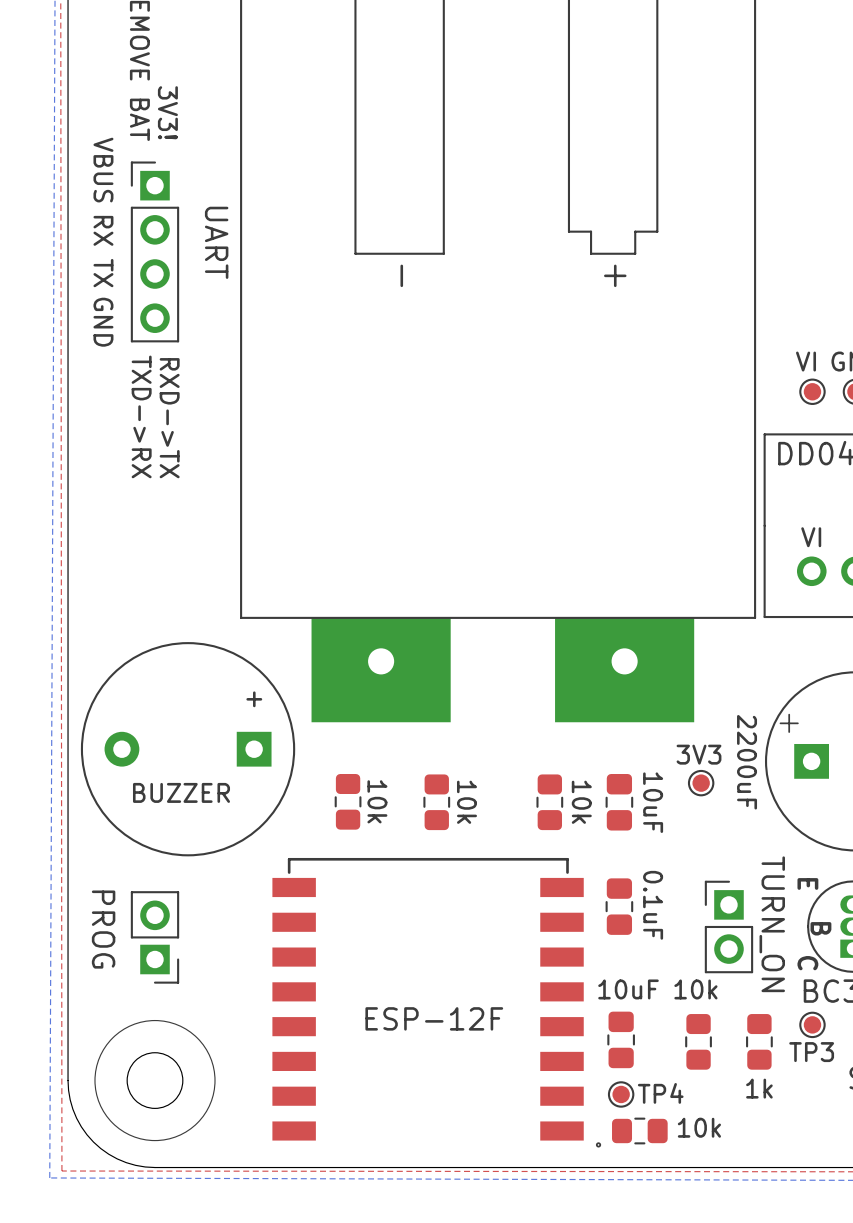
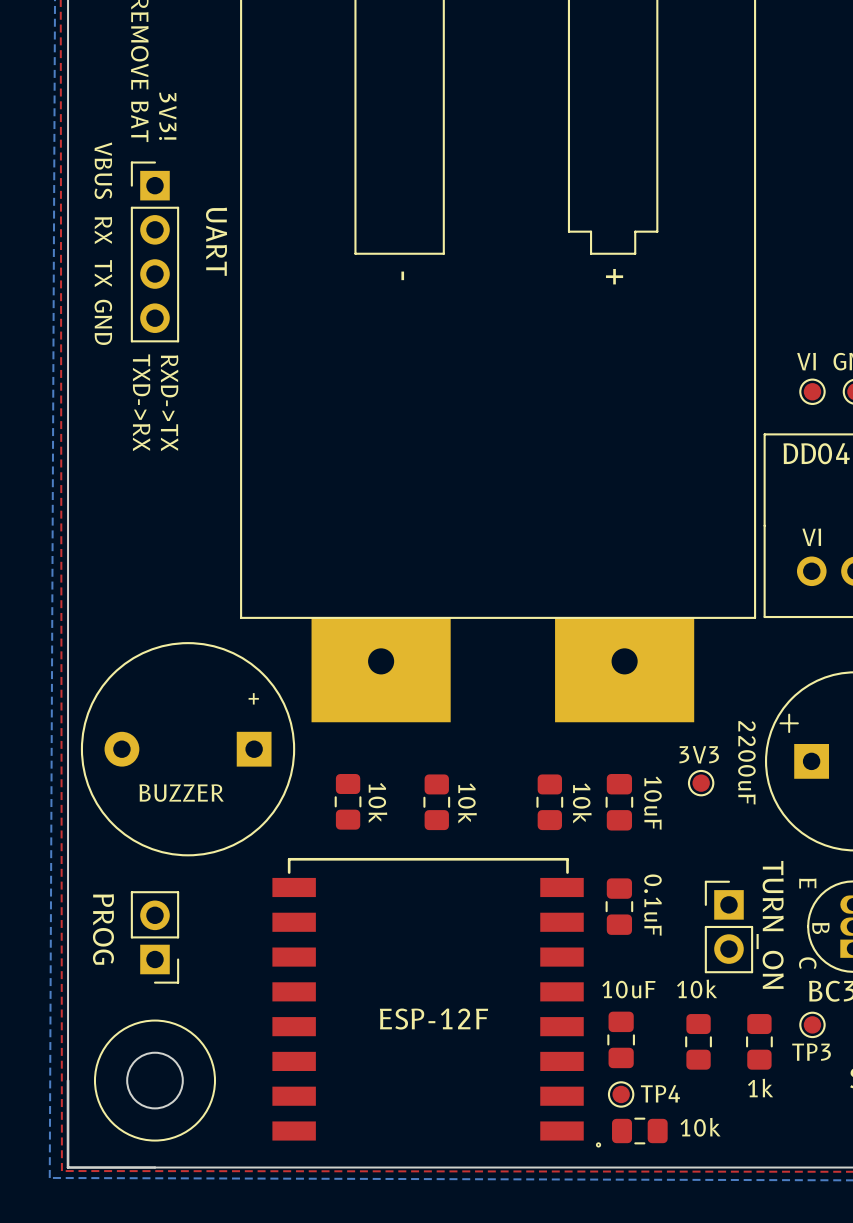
board edge: (68, 1080) (70, 1099) (76, 1118) (93, 1142) (108, 1154) (126, 1162) (154, 1167) -> (68, 1080) (68, 1167) (154, 1167)

